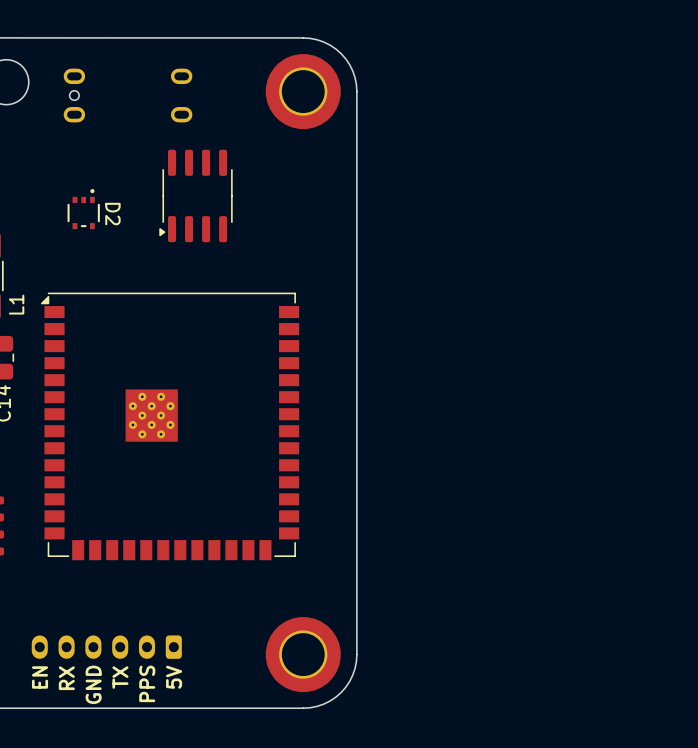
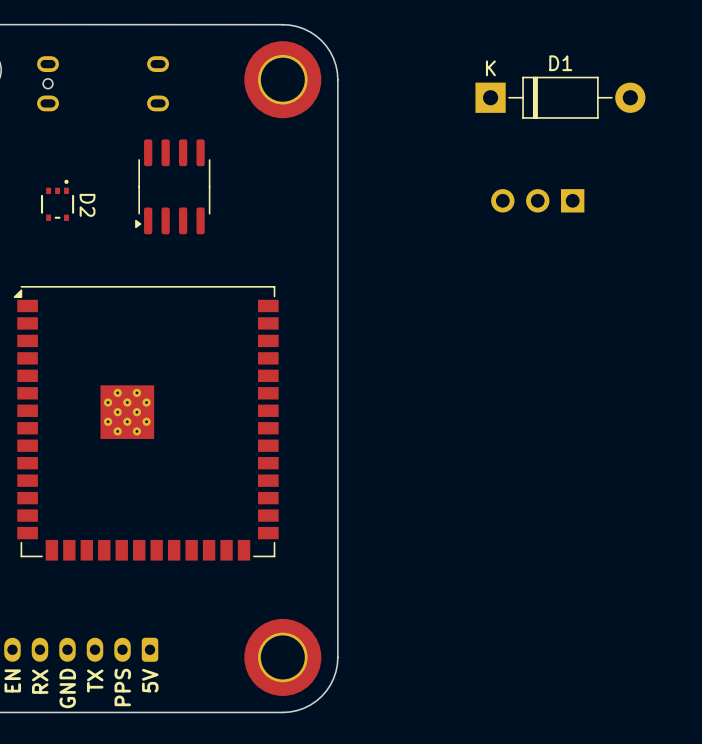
D1: none -> (560, 97)
part: none -> (537, 200)

